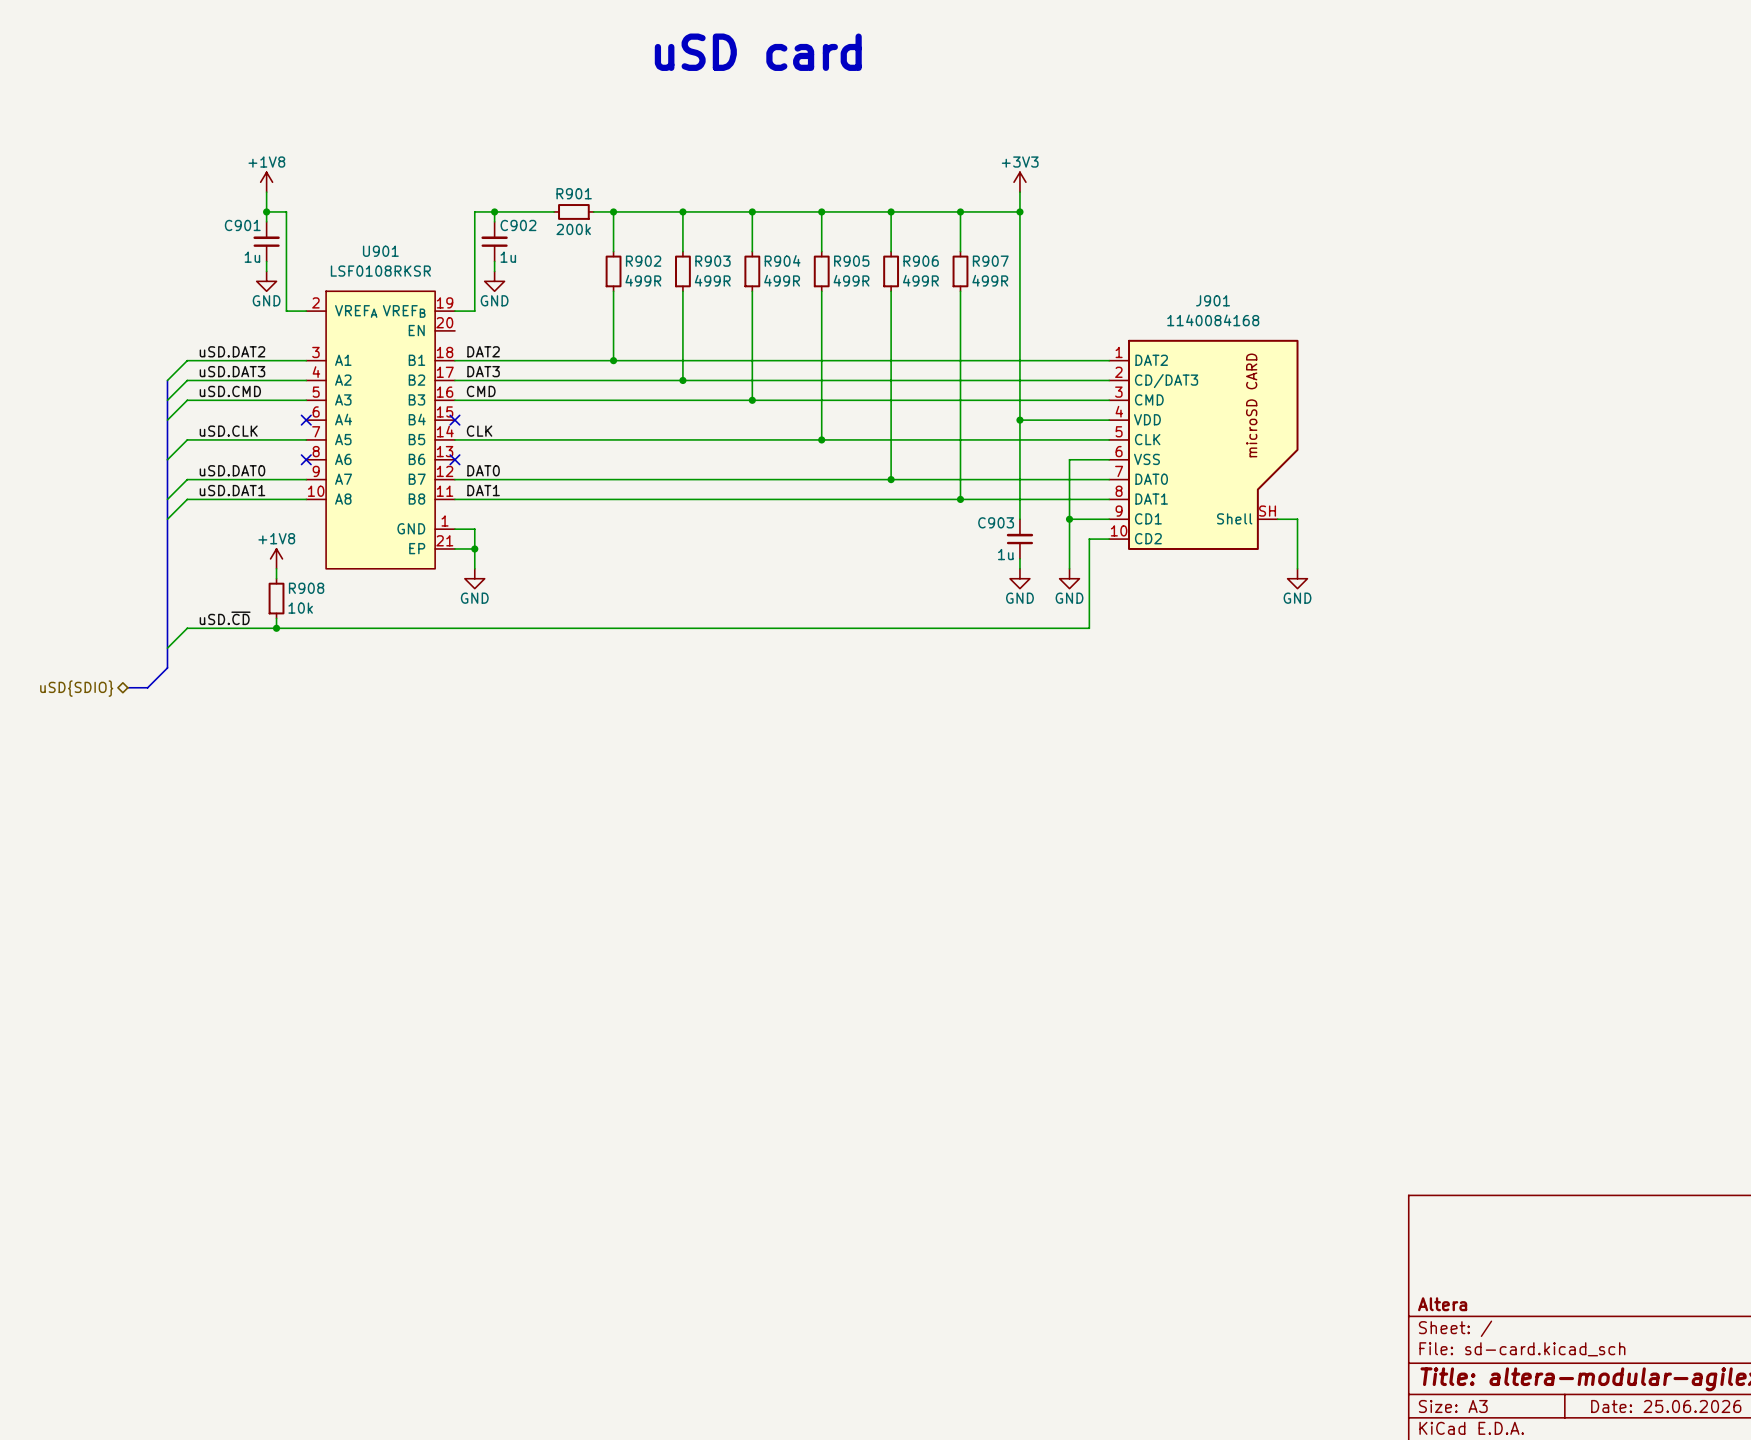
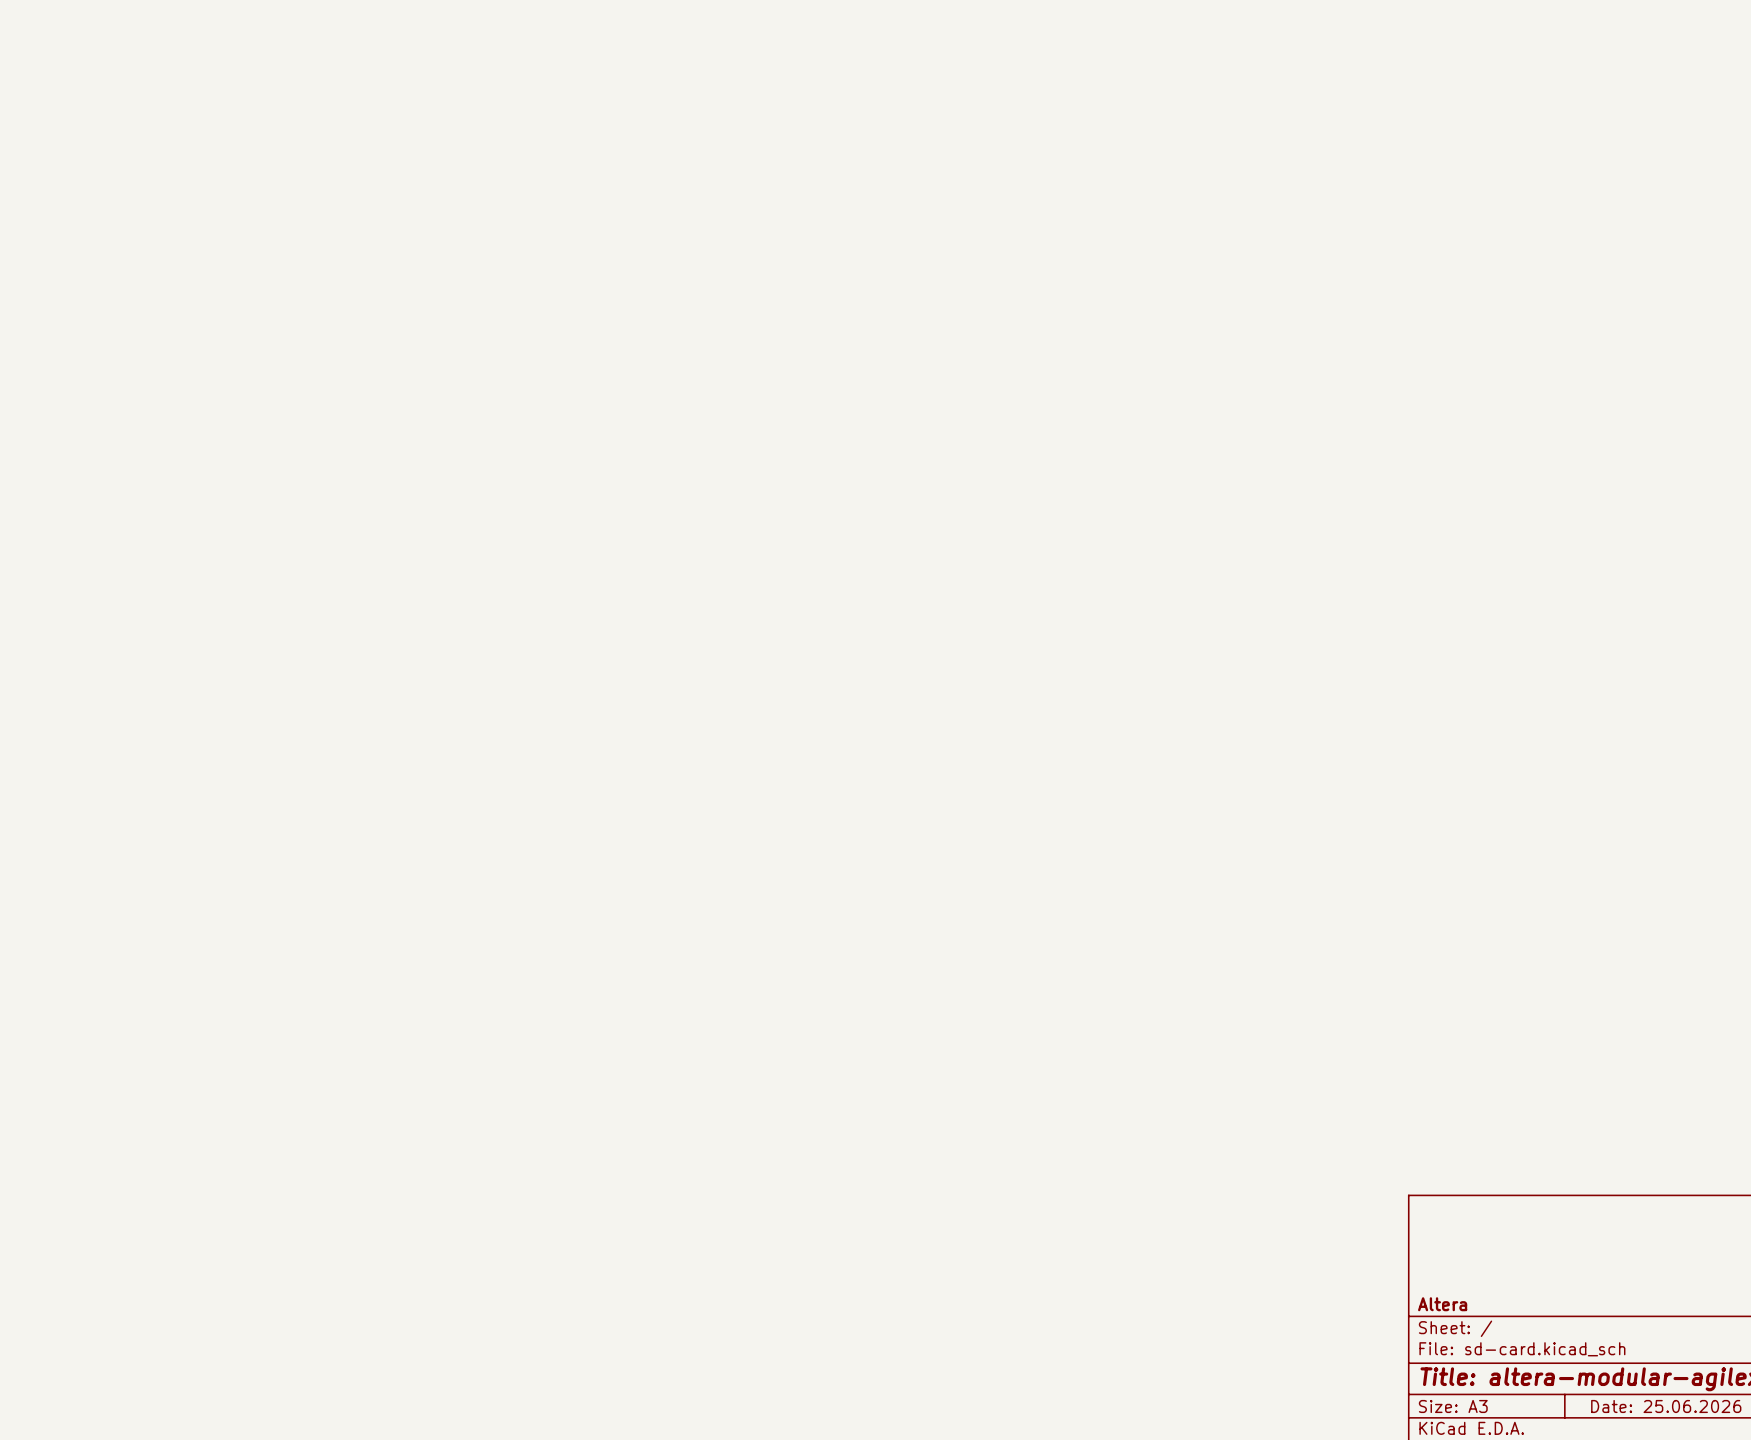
text: uSD card (758, 52) -> none
power symbol: +1V8 (266, 182) -> none
power symbol: +3V3 (1019, 182) -> none
wire: (266, 192) (266, 221) -> none
wire: (1019, 192) (1019, 519) -> none
wire: (266, 211) (286, 211) (286, 311) (306, 311) -> none
junction: (266, 211) -> none
wire: (494, 211) (494, 221) -> none
junction: (494, 211) -> none
wire: (554, 211) (474, 211) (474, 311) (454, 311) -> none
R901: (573, 211) -> none
wire: (593, 211) (1019, 211) -> none
wire: (613, 211) (613, 251) -> none
junction: (613, 211) -> none
wire: (682, 211) (682, 251) -> none
junction: (682, 211) -> none
wire: (752, 211) (752, 251) -> none
junction: (752, 211) -> none
wire: (821, 211) (821, 251) -> none
junction: (821, 211) -> none
wire: (891, 211) (891, 251) -> none
junction: (891, 211) -> none
wire: (960, 211) (960, 251) -> none
junction: (960, 211) -> none
junction: (1019, 211) -> none
C901: (266, 241) -> none
C902: (494, 241) -> none
wire: (266, 261) (266, 271) -> none
wire: (494, 261) (494, 271) -> none
R902: (613, 271) -> none
R903: (682, 271) -> none
R904: (752, 271) -> none
R905: (821, 271) -> none
R906: (891, 271) -> none
R907: (960, 271) -> none
power symbol: GND (266, 281) -> none
power symbol: GND (494, 281) -> none
wire: (613, 291) (613, 360) -> none
wire: (682, 291) (682, 380) -> none
wire: (752, 291) (752, 400) -> none
wire: (821, 291) (821, 439) -> none
wire: (891, 291) (891, 479) -> none
wire: (960, 291) (960, 499) -> none
label: uSD.DAT2 (232, 351) -> none
label: DAT2 (483, 351) -> none
wire: (306, 360) (187, 360) (167, 380) -> none
wire: (454, 360) (1109, 360) -> none
junction: (613, 360) -> none
label: uSD.DAT3 (232, 371) -> none
label: DAT3 (483, 371) -> none
bus: (167, 380) (167, 667) (147, 687) (127, 687) -> none
wire: (306, 380) (187, 380) (167, 400) -> none
wire: (454, 380) (1109, 380) -> none
junction: (682, 380) -> none
label: uSD.CMD (230, 391) -> none
label: CMD (481, 391) -> none
wire: (306, 400) (187, 400) (167, 420) -> none
wire: (454, 400) (1109, 400) -> none
junction: (752, 400) -> none
no-connect mark: (306, 420) -> none
no-connect mark: (454, 420) -> none
wire: (1019, 420) (1109, 420) -> none
junction: (1019, 420) -> none
U901: (380, 430) -> none
label: uSD.CLK (228, 431) -> none
label: CLK (479, 431) -> none
wire: (306, 439) (187, 439) (167, 459) -> none
wire: (454, 439) (1109, 439) -> none
junction: (821, 439) -> none
J901: (1203, 444) -> none
no-connect mark: (306, 459) -> none
no-connect mark: (454, 459) -> none
wire: (1109, 459) (1069, 459) (1069, 568) -> none
label: uSD.DAT0 (232, 470) -> none
label: DAT0 (483, 470) -> none
wire: (306, 479) (187, 479) (167, 499) -> none
wire: (454, 479) (1109, 479) -> none
junction: (891, 479) -> none
label: uSD.DAT1 (232, 490) -> none
label: DAT1 (483, 490) -> none
wire: (306, 499) (187, 499) (167, 519) -> none
wire: (454, 499) (1109, 499) -> none
junction: (960, 499) -> none
wire: (1069, 519) (1109, 519) -> none
junction: (1069, 519) -> none
wire: (1277, 519) (1297, 519) (1297, 568) -> none
wire: (454, 529) (474, 529) (474, 568) -> none
C903: (1019, 539) -> none
wire: (1109, 539) (1089, 539) (1089, 628) (187, 628) (167, 648) -> none
wire: (454, 548) (474, 548) -> none
junction: (474, 548) -> none
power symbol: +1V8 (276, 558) -> none
wire: (1019, 558) (1019, 568) -> none
wire: (276, 568) (276, 578) -> none
power symbol: GND (474, 578) -> none
power symbol: GND (1019, 578) -> none
power symbol: GND (1069, 578) -> none
power symbol: GND (1297, 578) -> none
R908: (276, 598) -> none
label: uSD.~{CD} (225, 618) -> none
wire: (276, 618) (276, 628) -> none
junction: (276, 628) -> none
hierarchical label: uSD{SDIO} (76, 688) -> none

